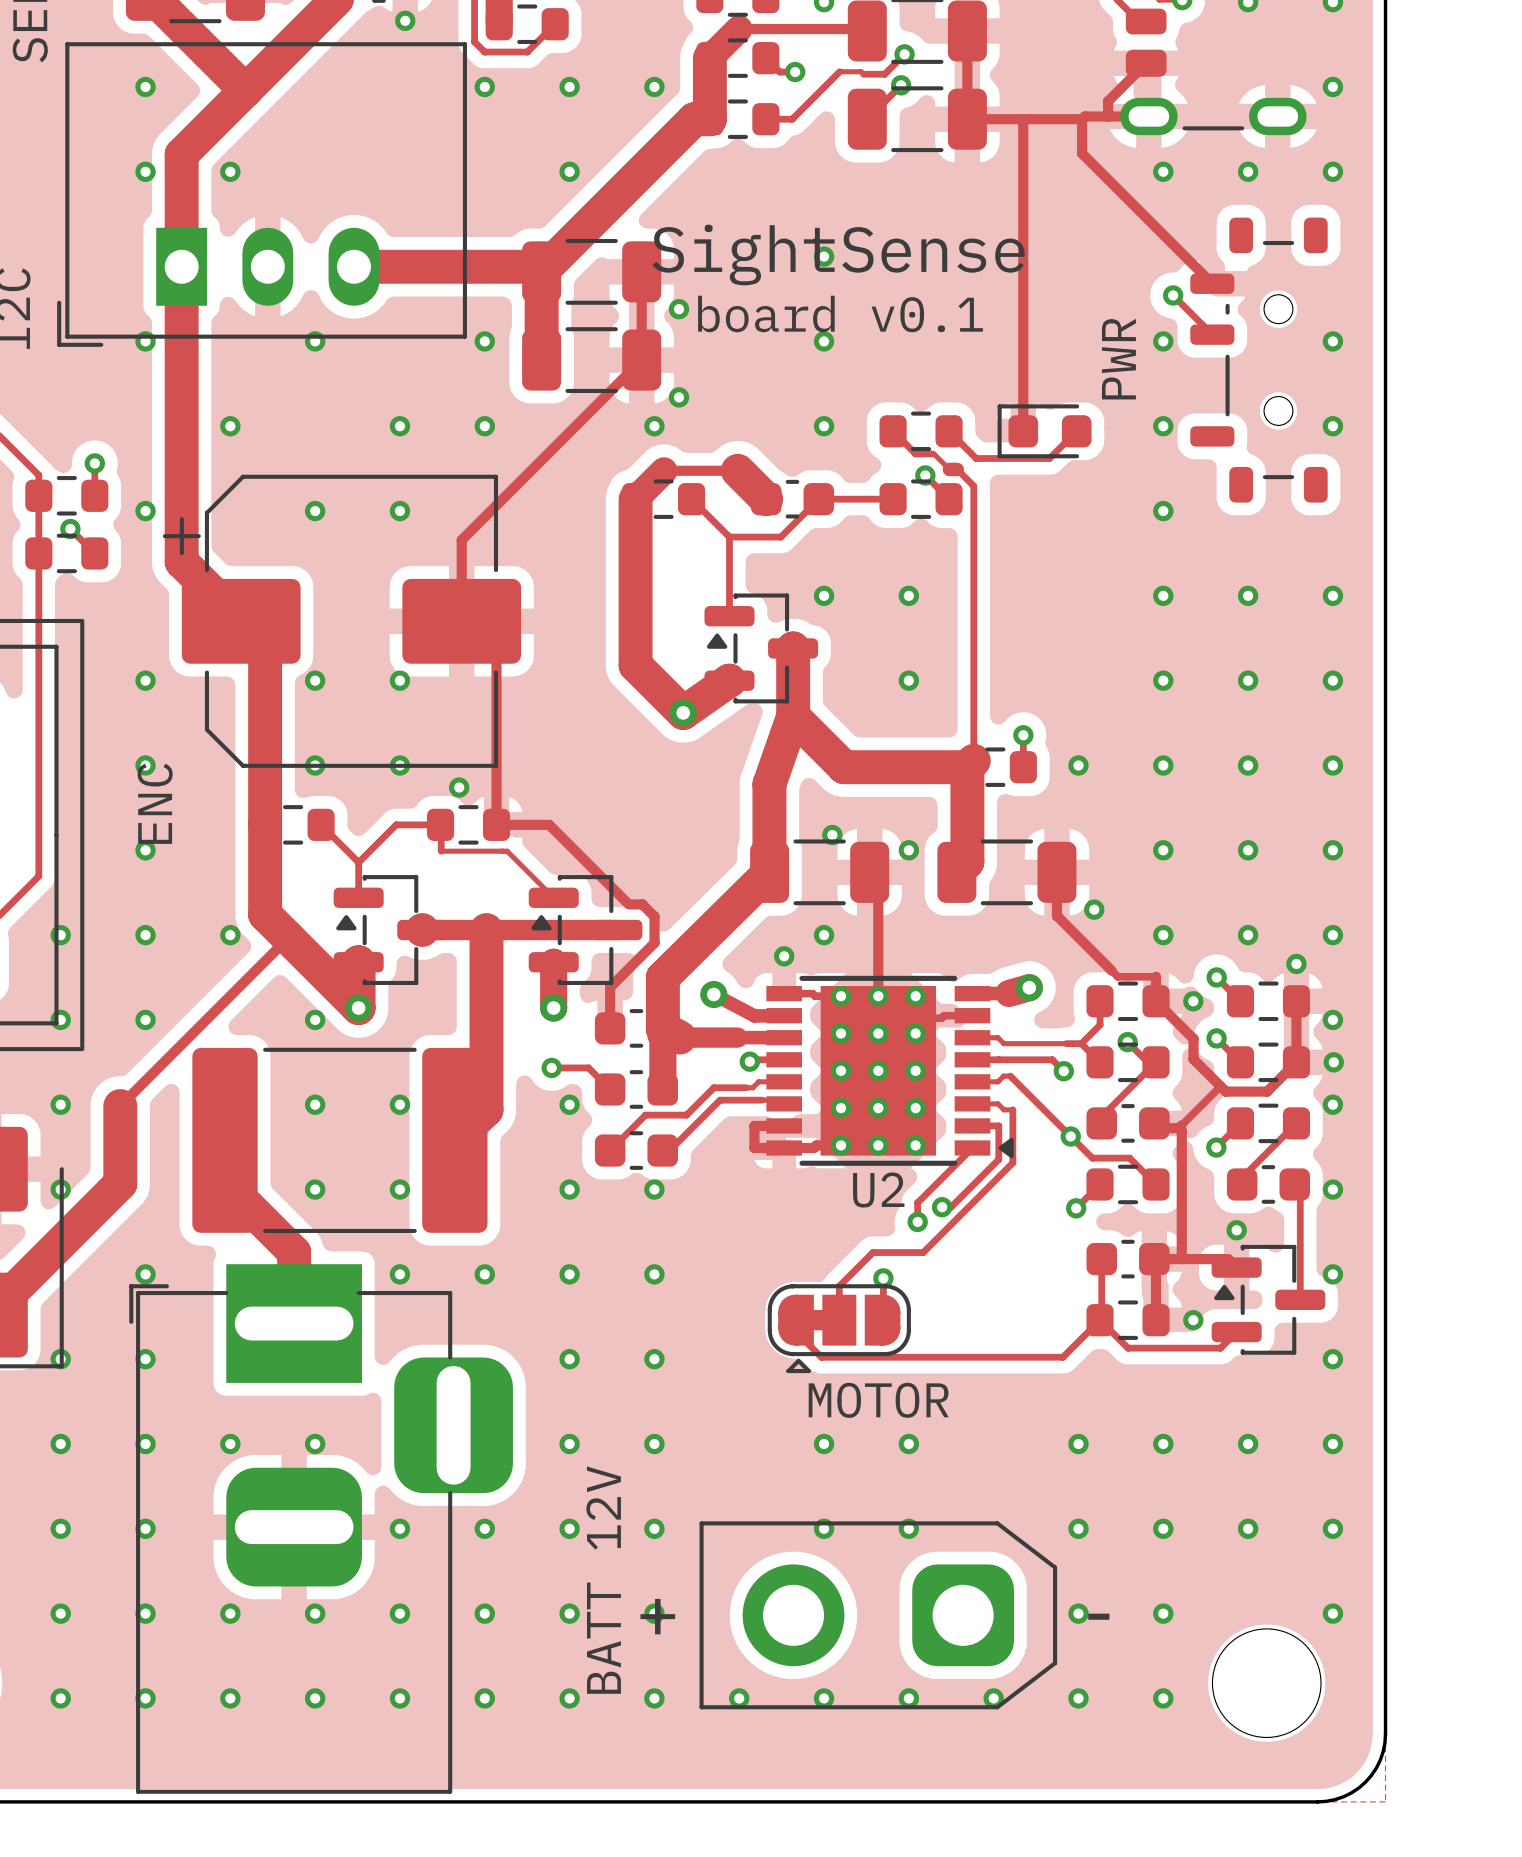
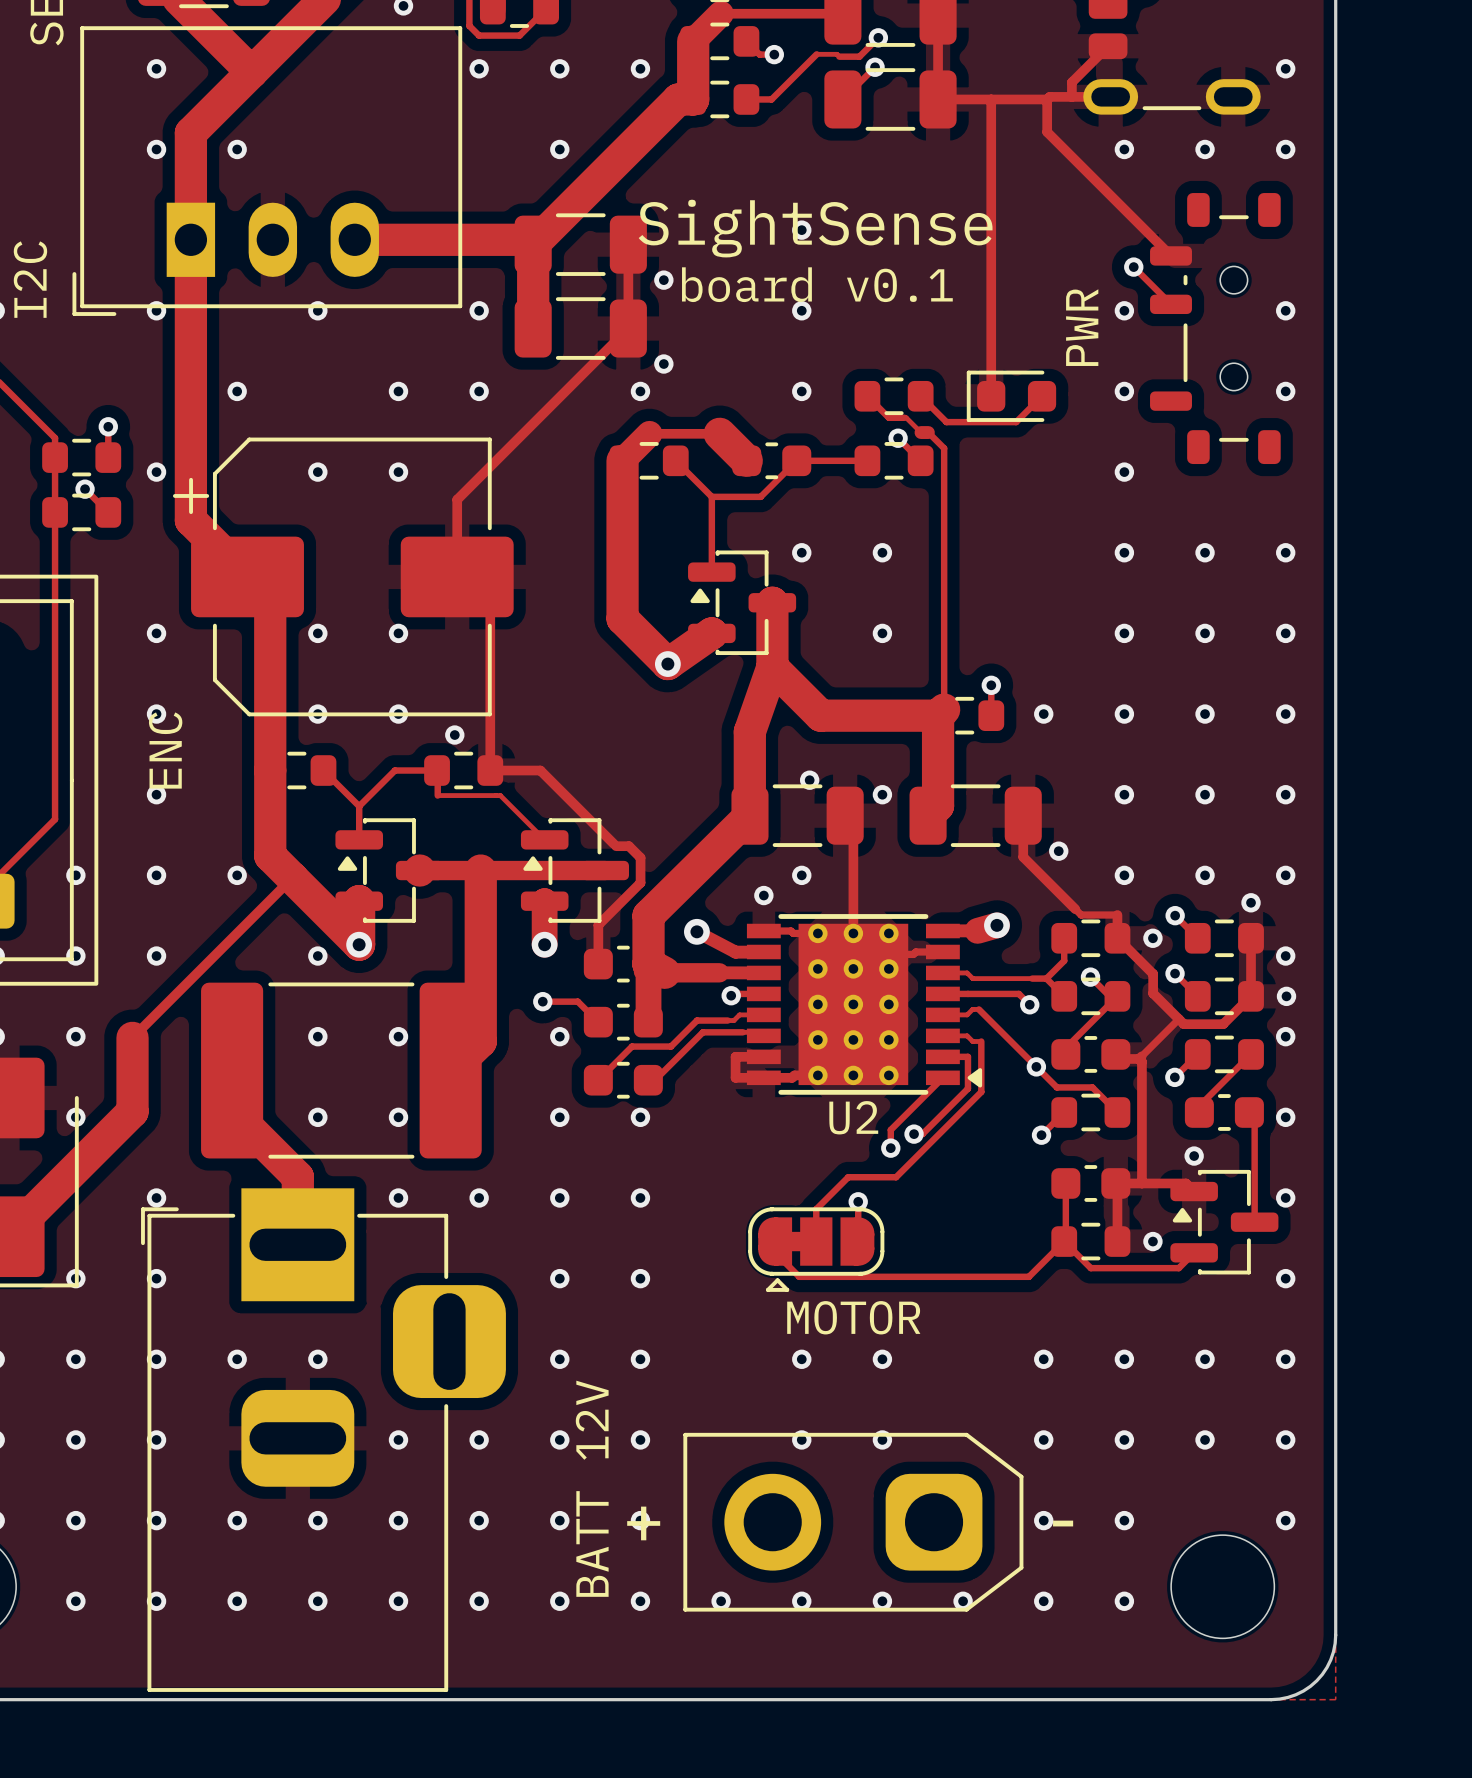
part footprint: [129, 1264, 513, 1794] -> [141, 1188, 506, 1692]

